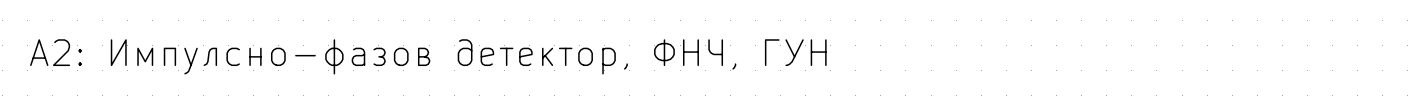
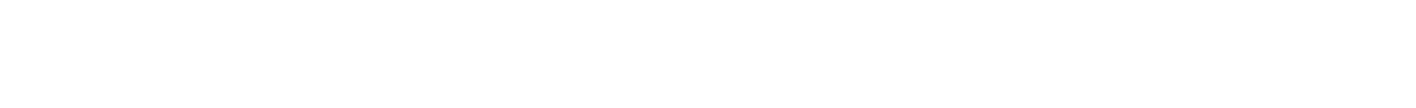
text: А2: Импулсно-фазов детектор, ФНЧ, ГУН (428, 56) -> none

